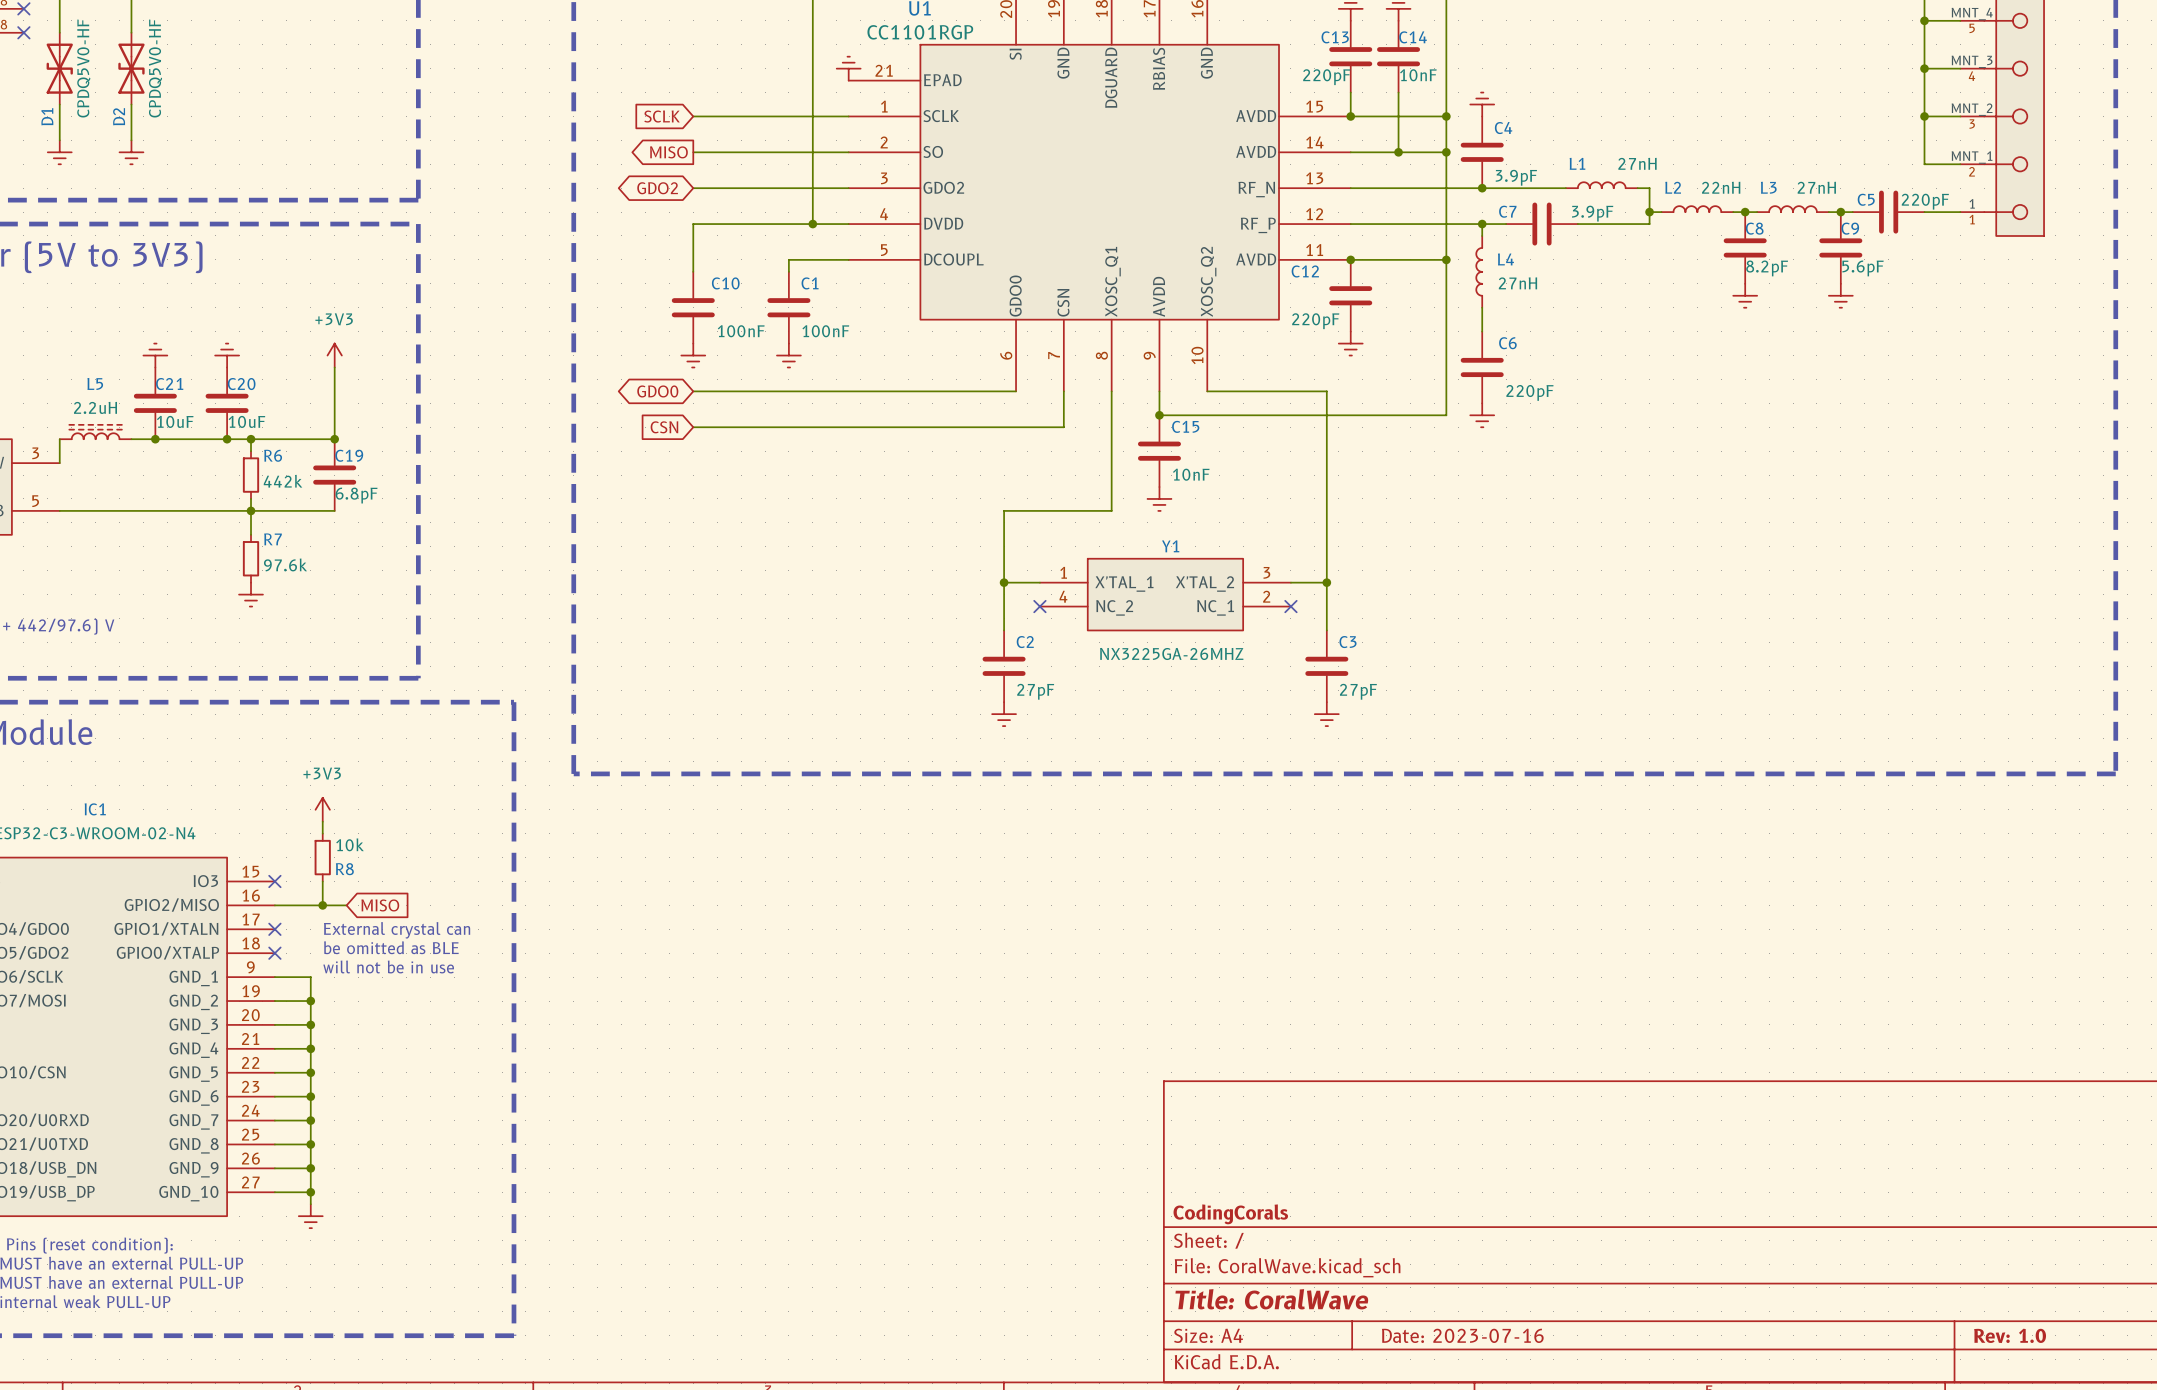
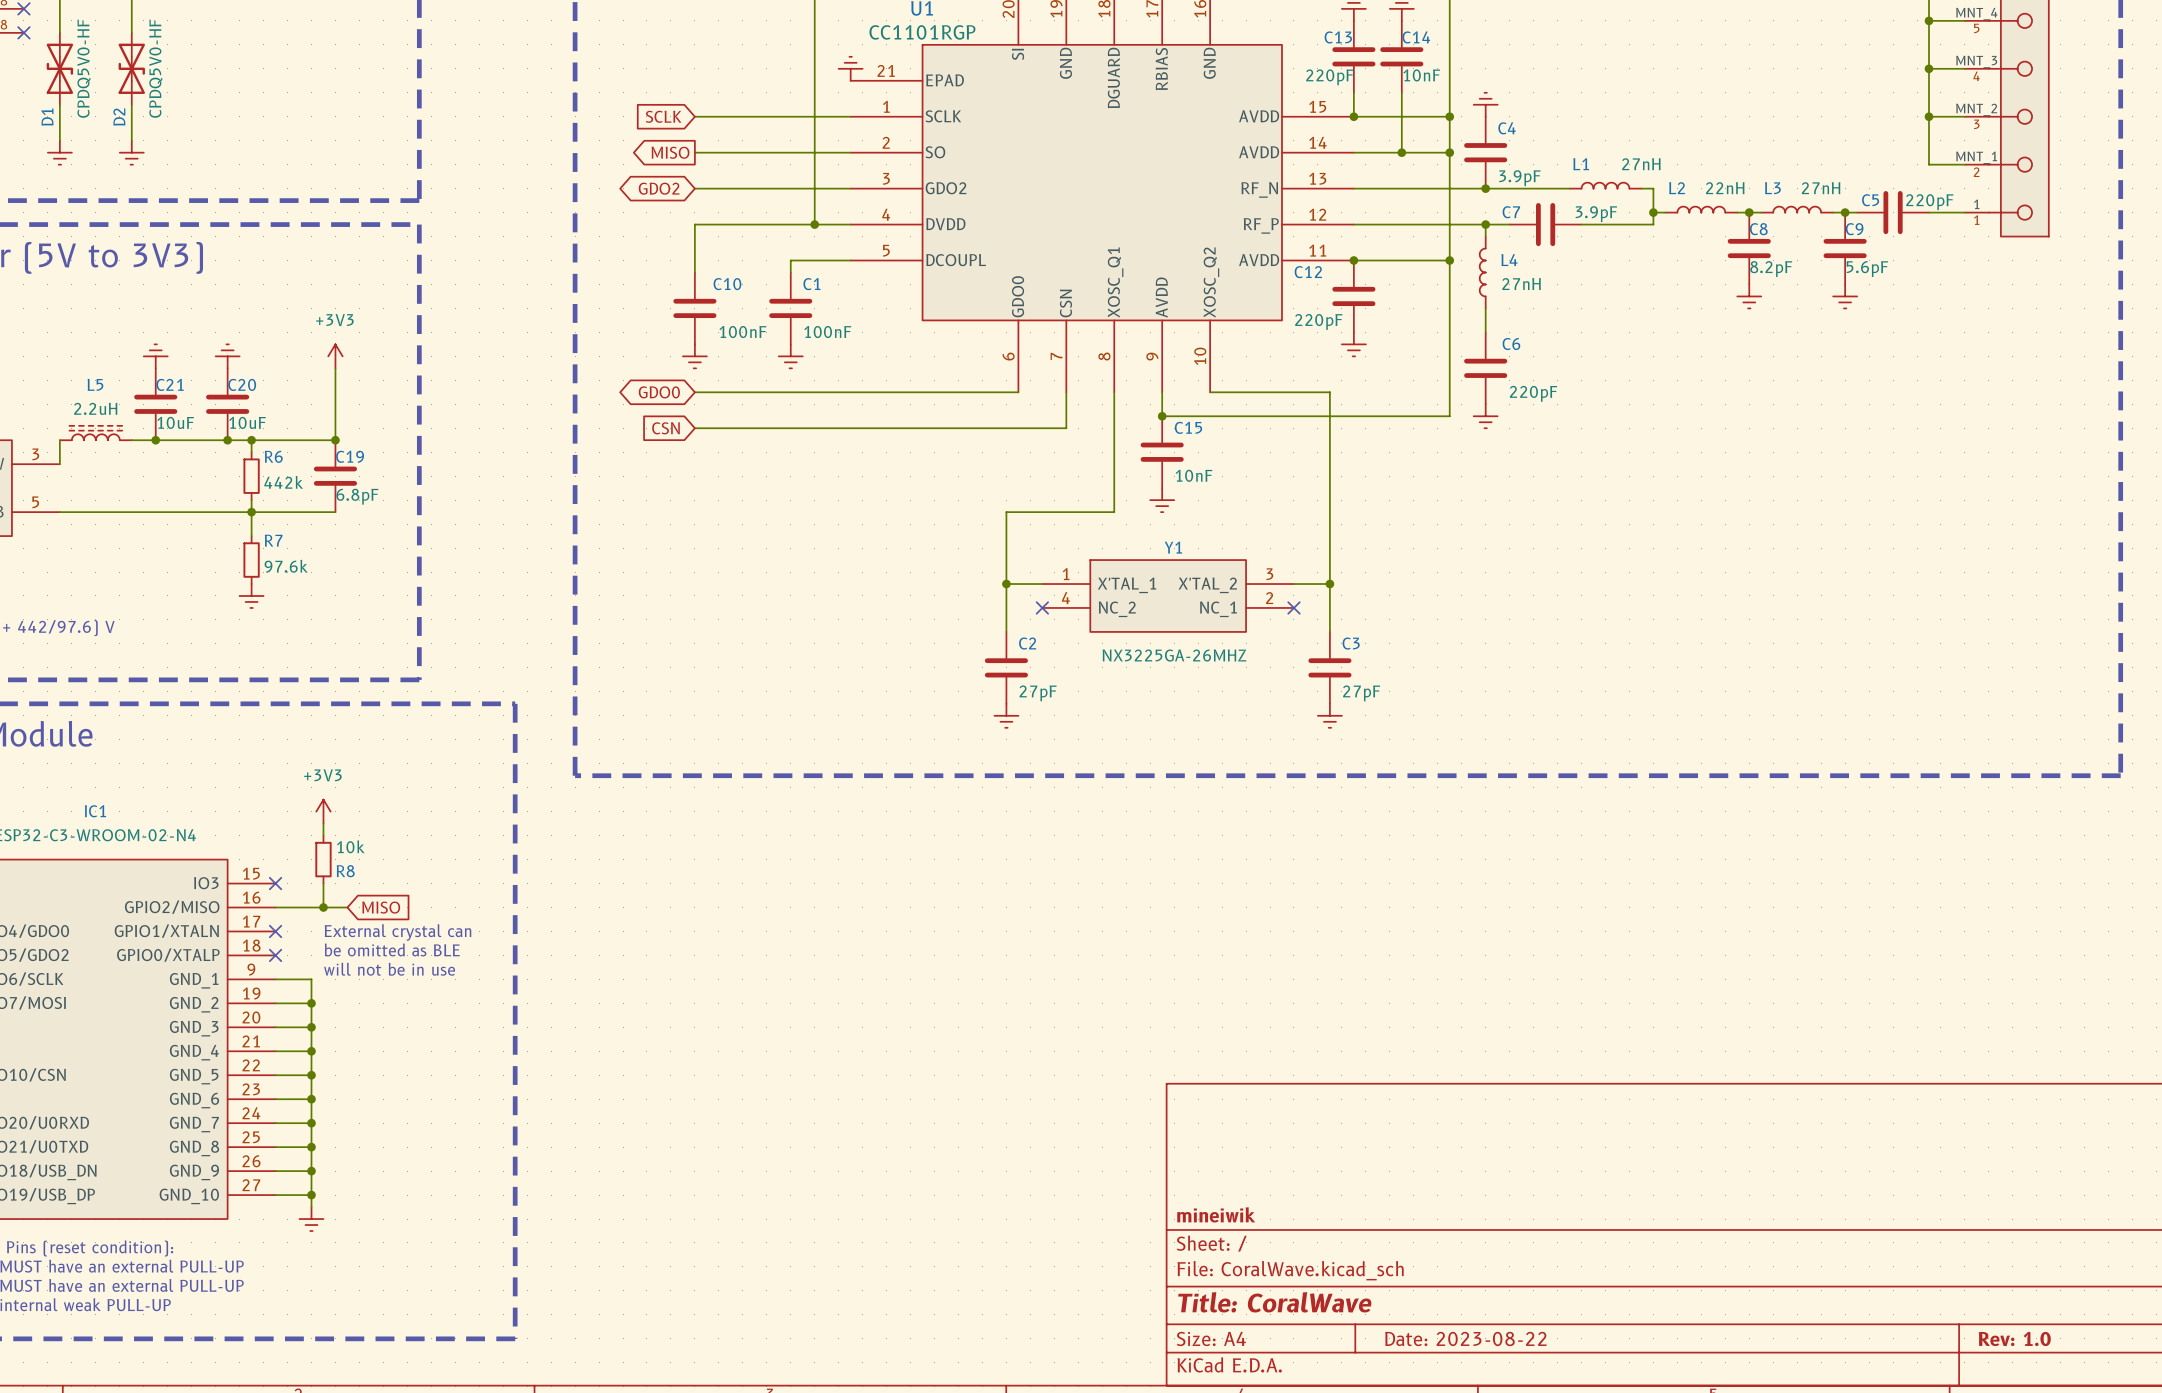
title block: CodingCorals (1230, 1214) -> mineiwik (1216, 1214)
title block: Date: 2023-07-16 (1462, 1335) -> Date: 2023-08-22 (1465, 1338)

